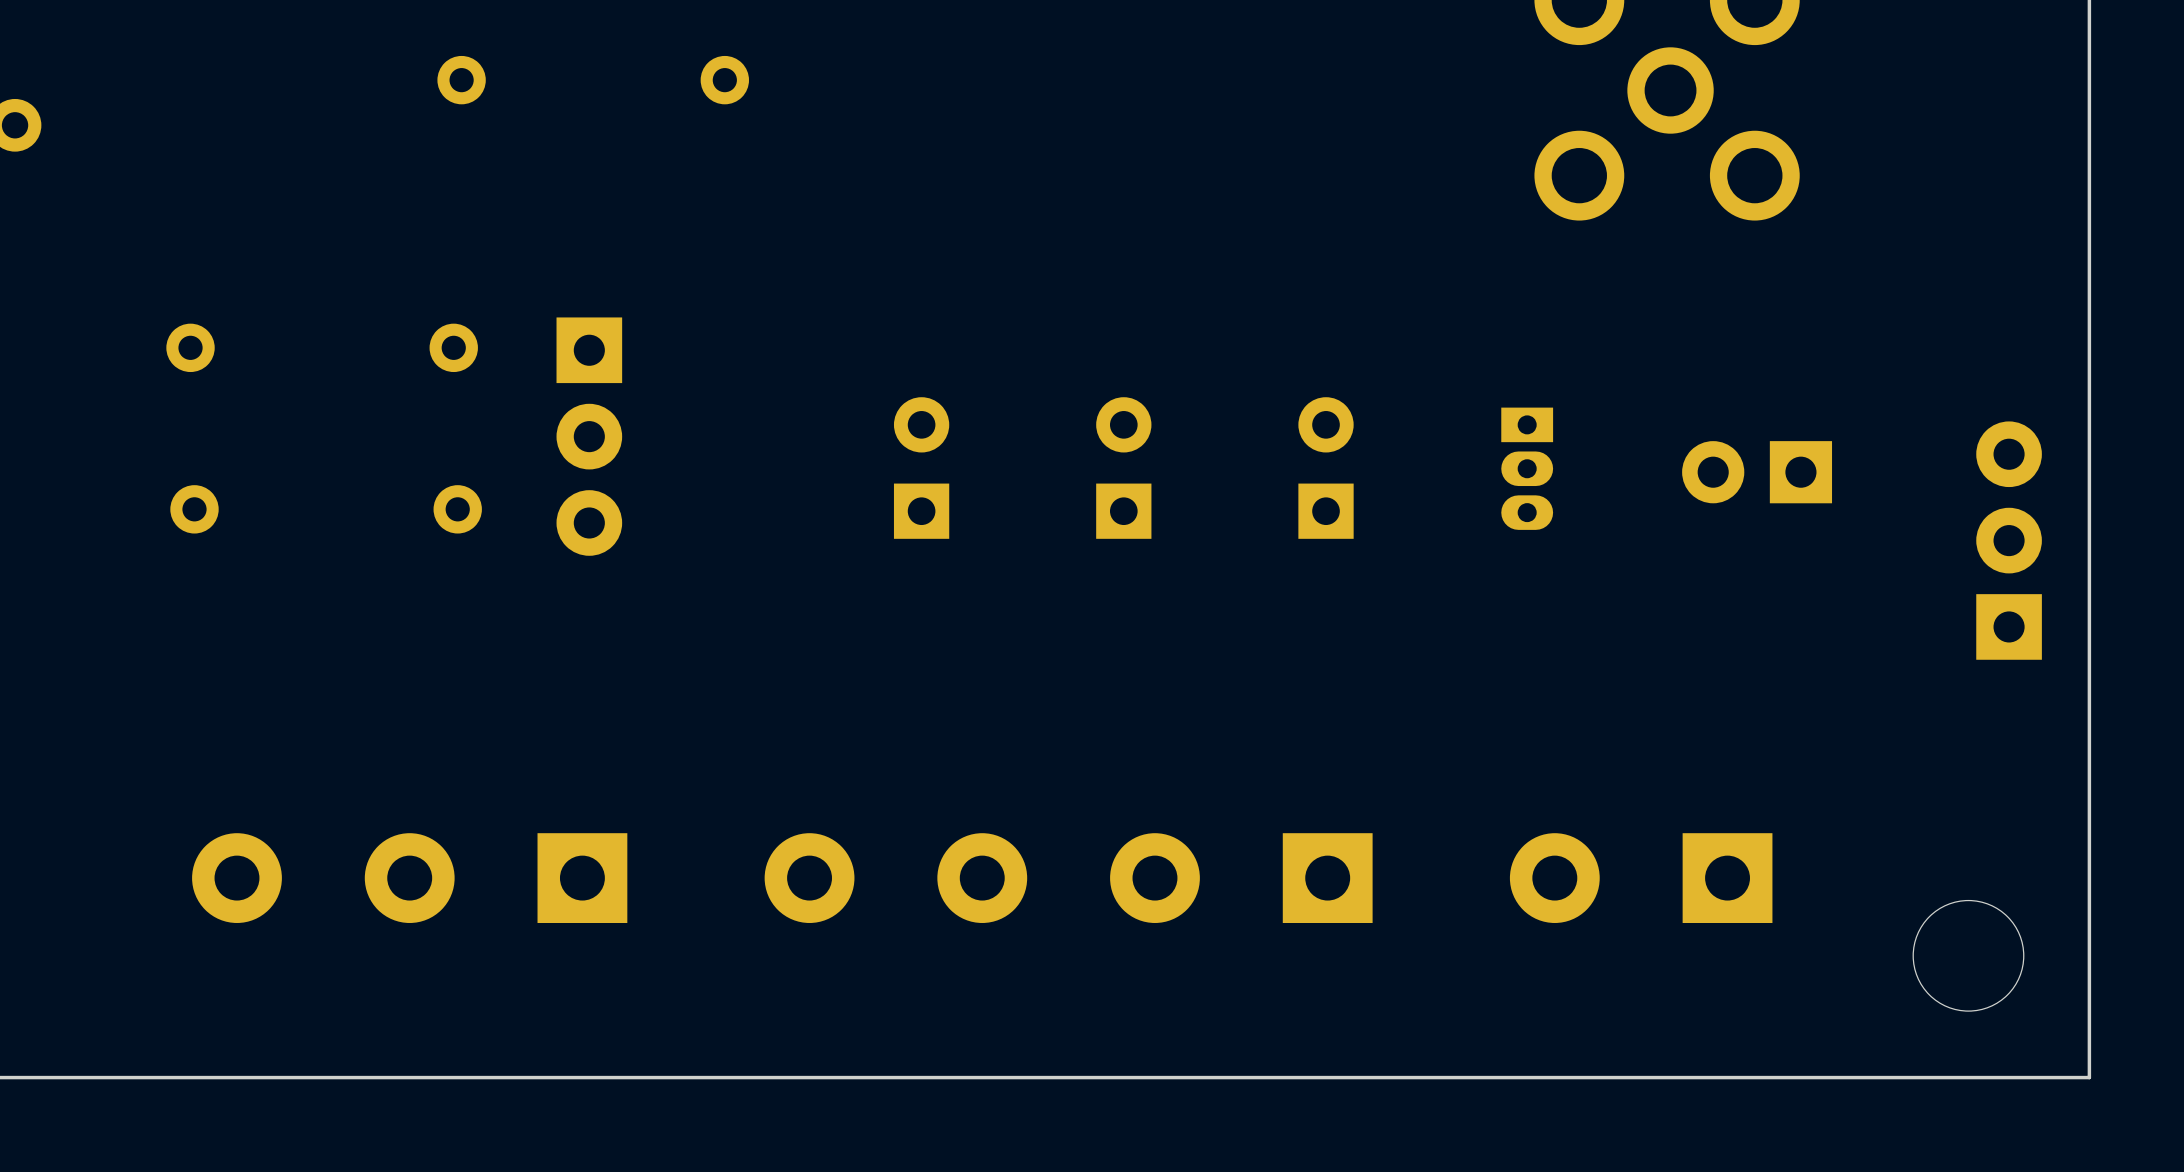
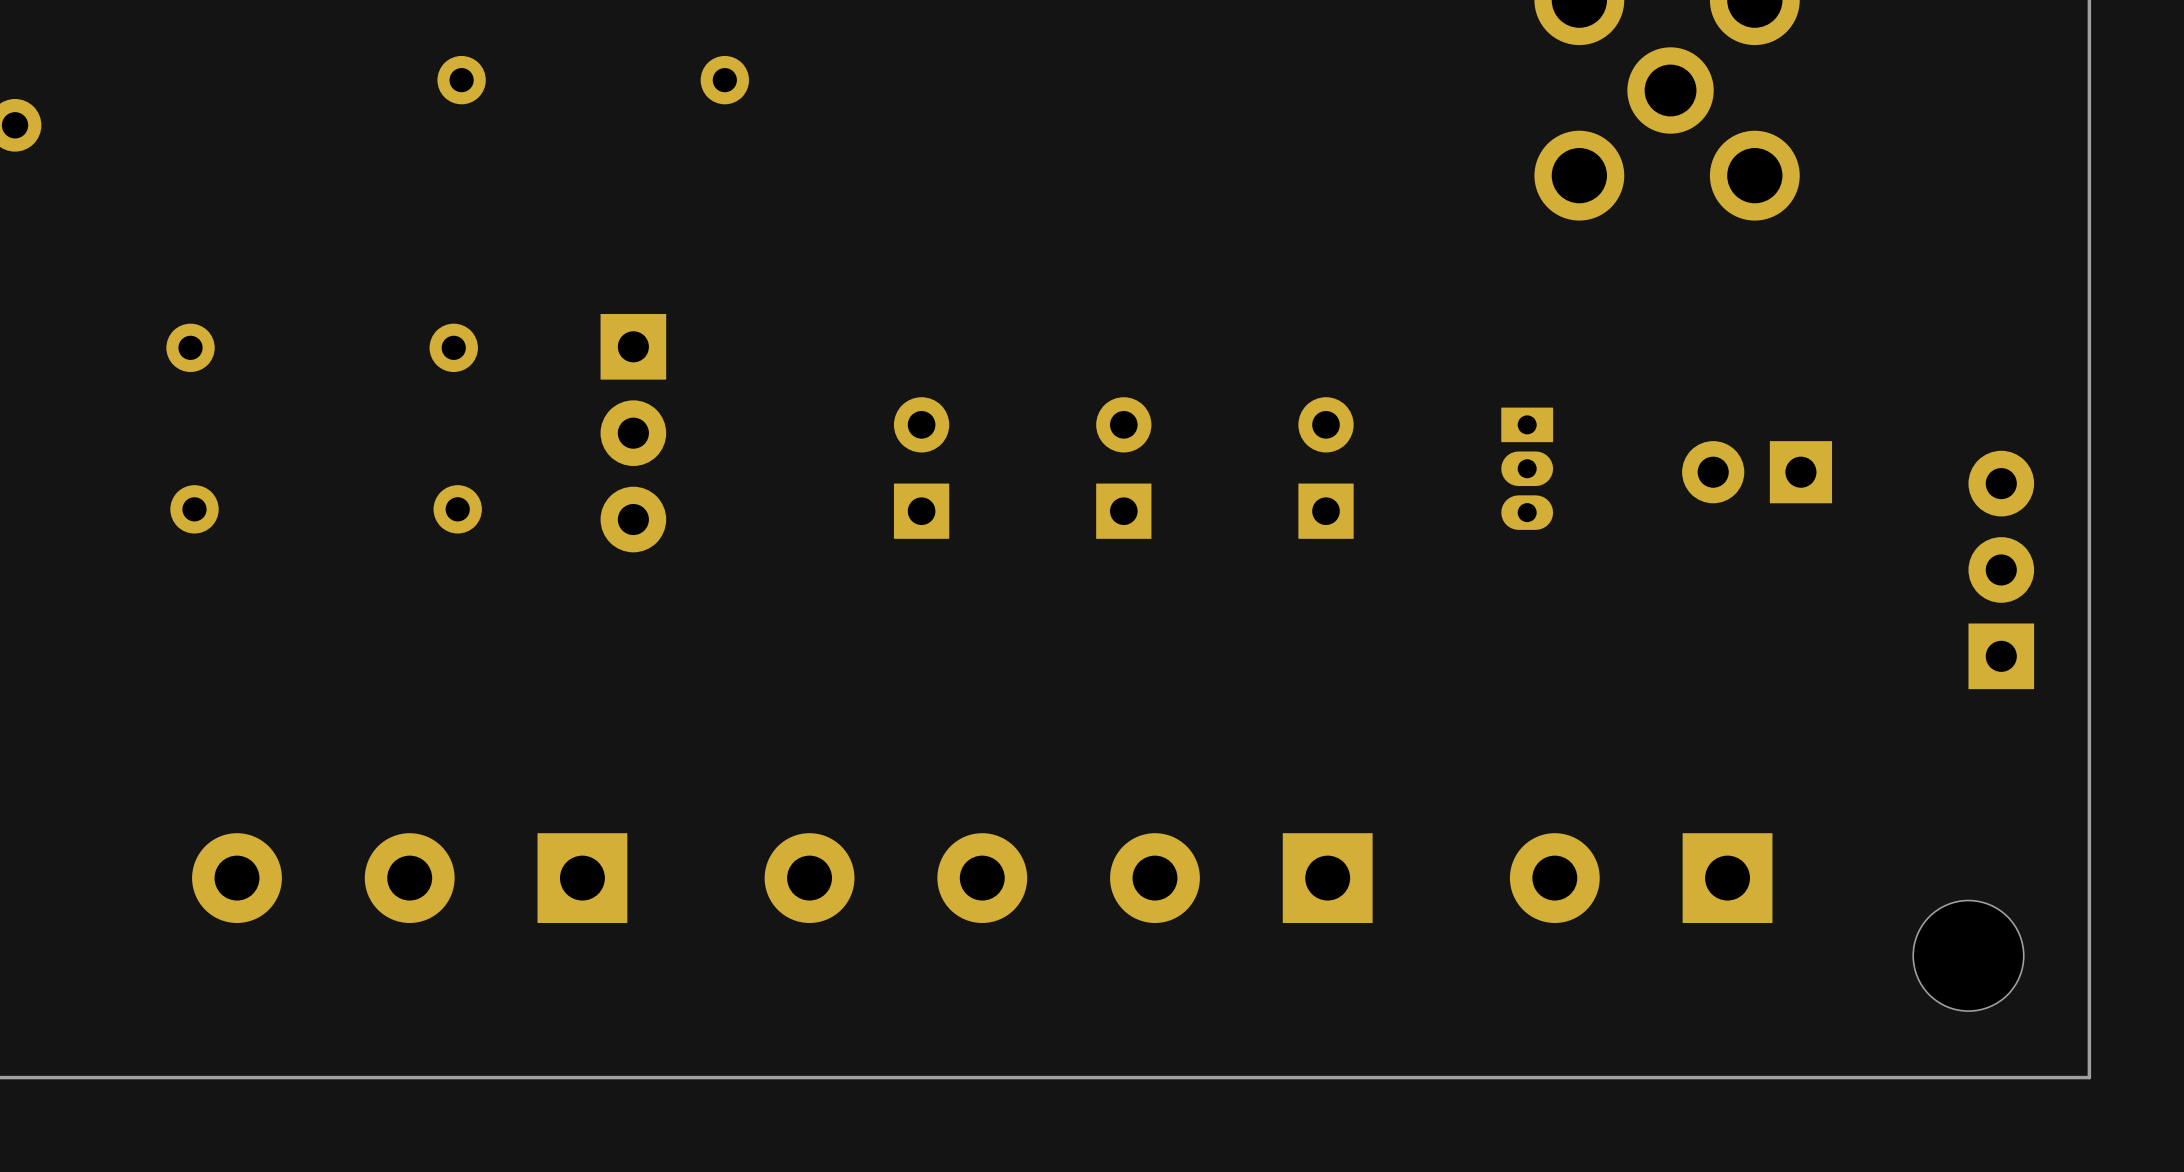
part position: (589, 436) -> (633, 433)
part position: (2009, 540) -> (2001, 569)

